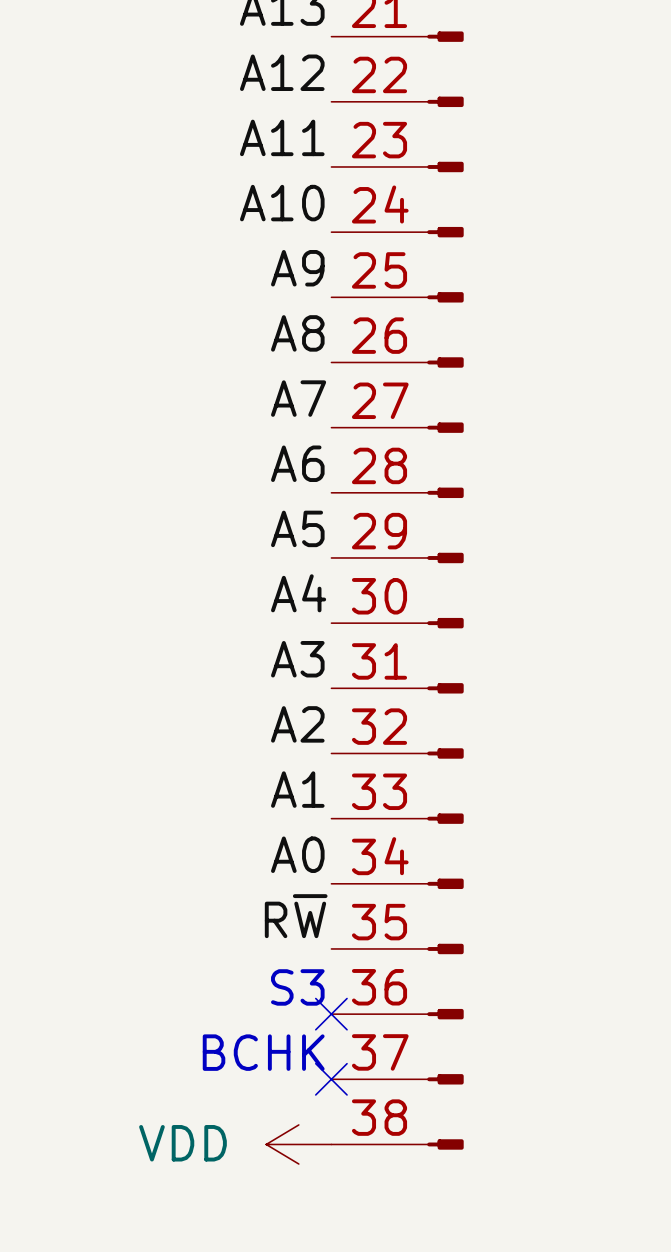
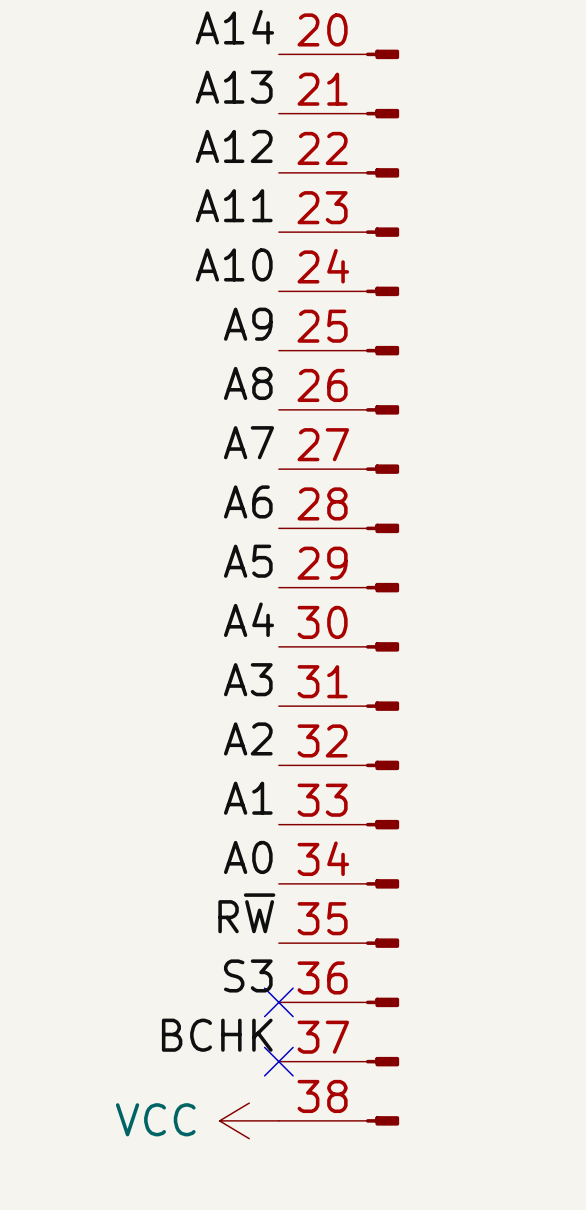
label: none -> S3 (248, 975)
text: S3 (297, 987) -> none
label: none -> BCHK (217, 1035)
text: BCHK (263, 1052) -> none
power symbol: VDD (298, 1144) -> VCC (249, 1120)

